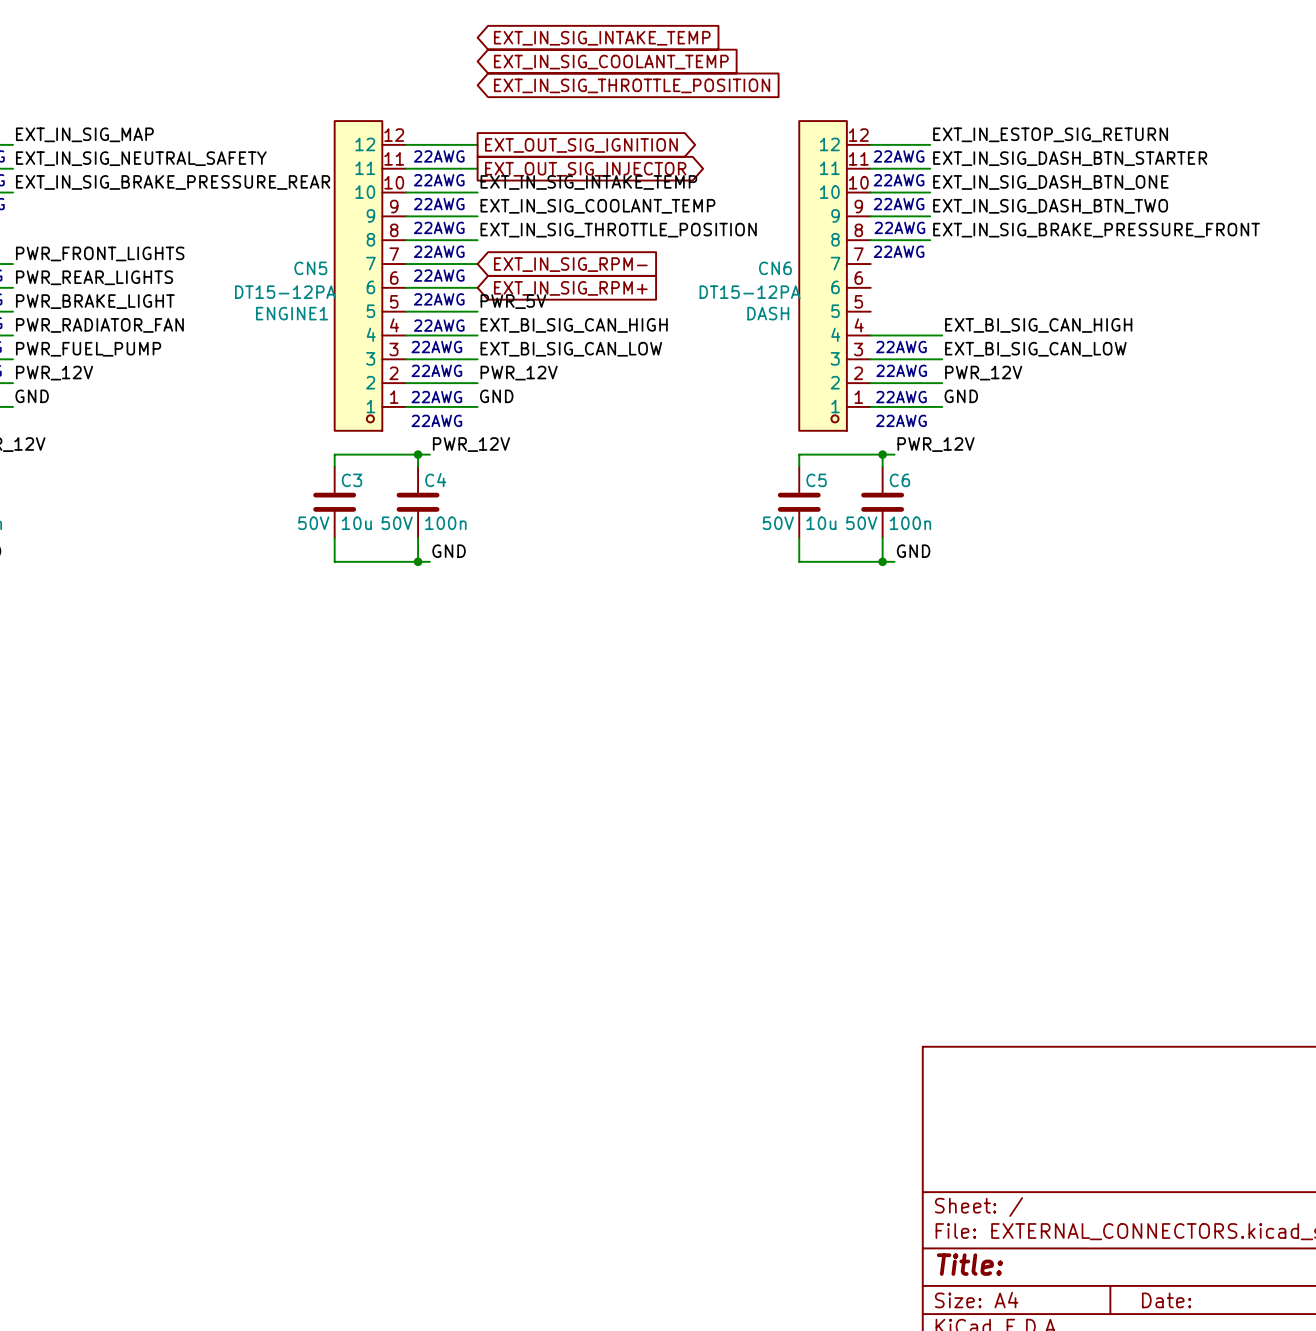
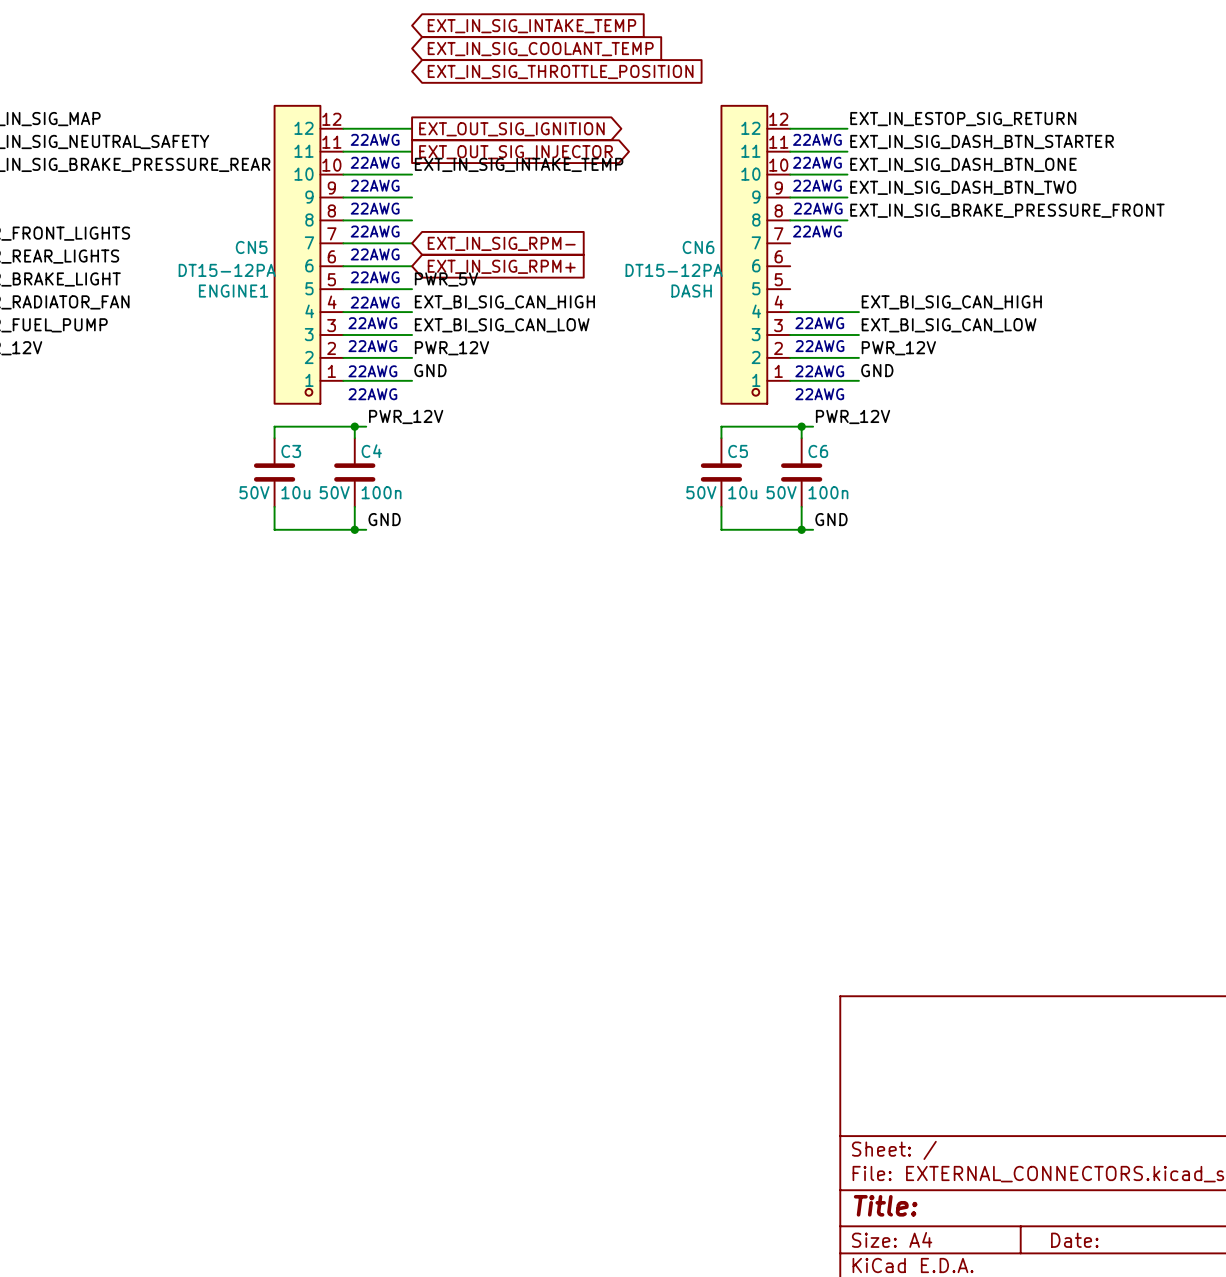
label: EXT_IN_SIG_COOLANT_TEMP (597, 206) -> none
label: EXT_IN_SIG_THROTTLE_POSITION (618, 230) -> none

